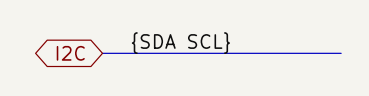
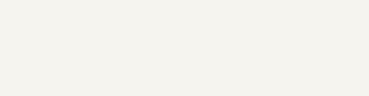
label: {SDA SCL} (180, 43) -> none
global label: I2C (70, 53) -> none
bus: (102, 53) (341, 53) -> none

